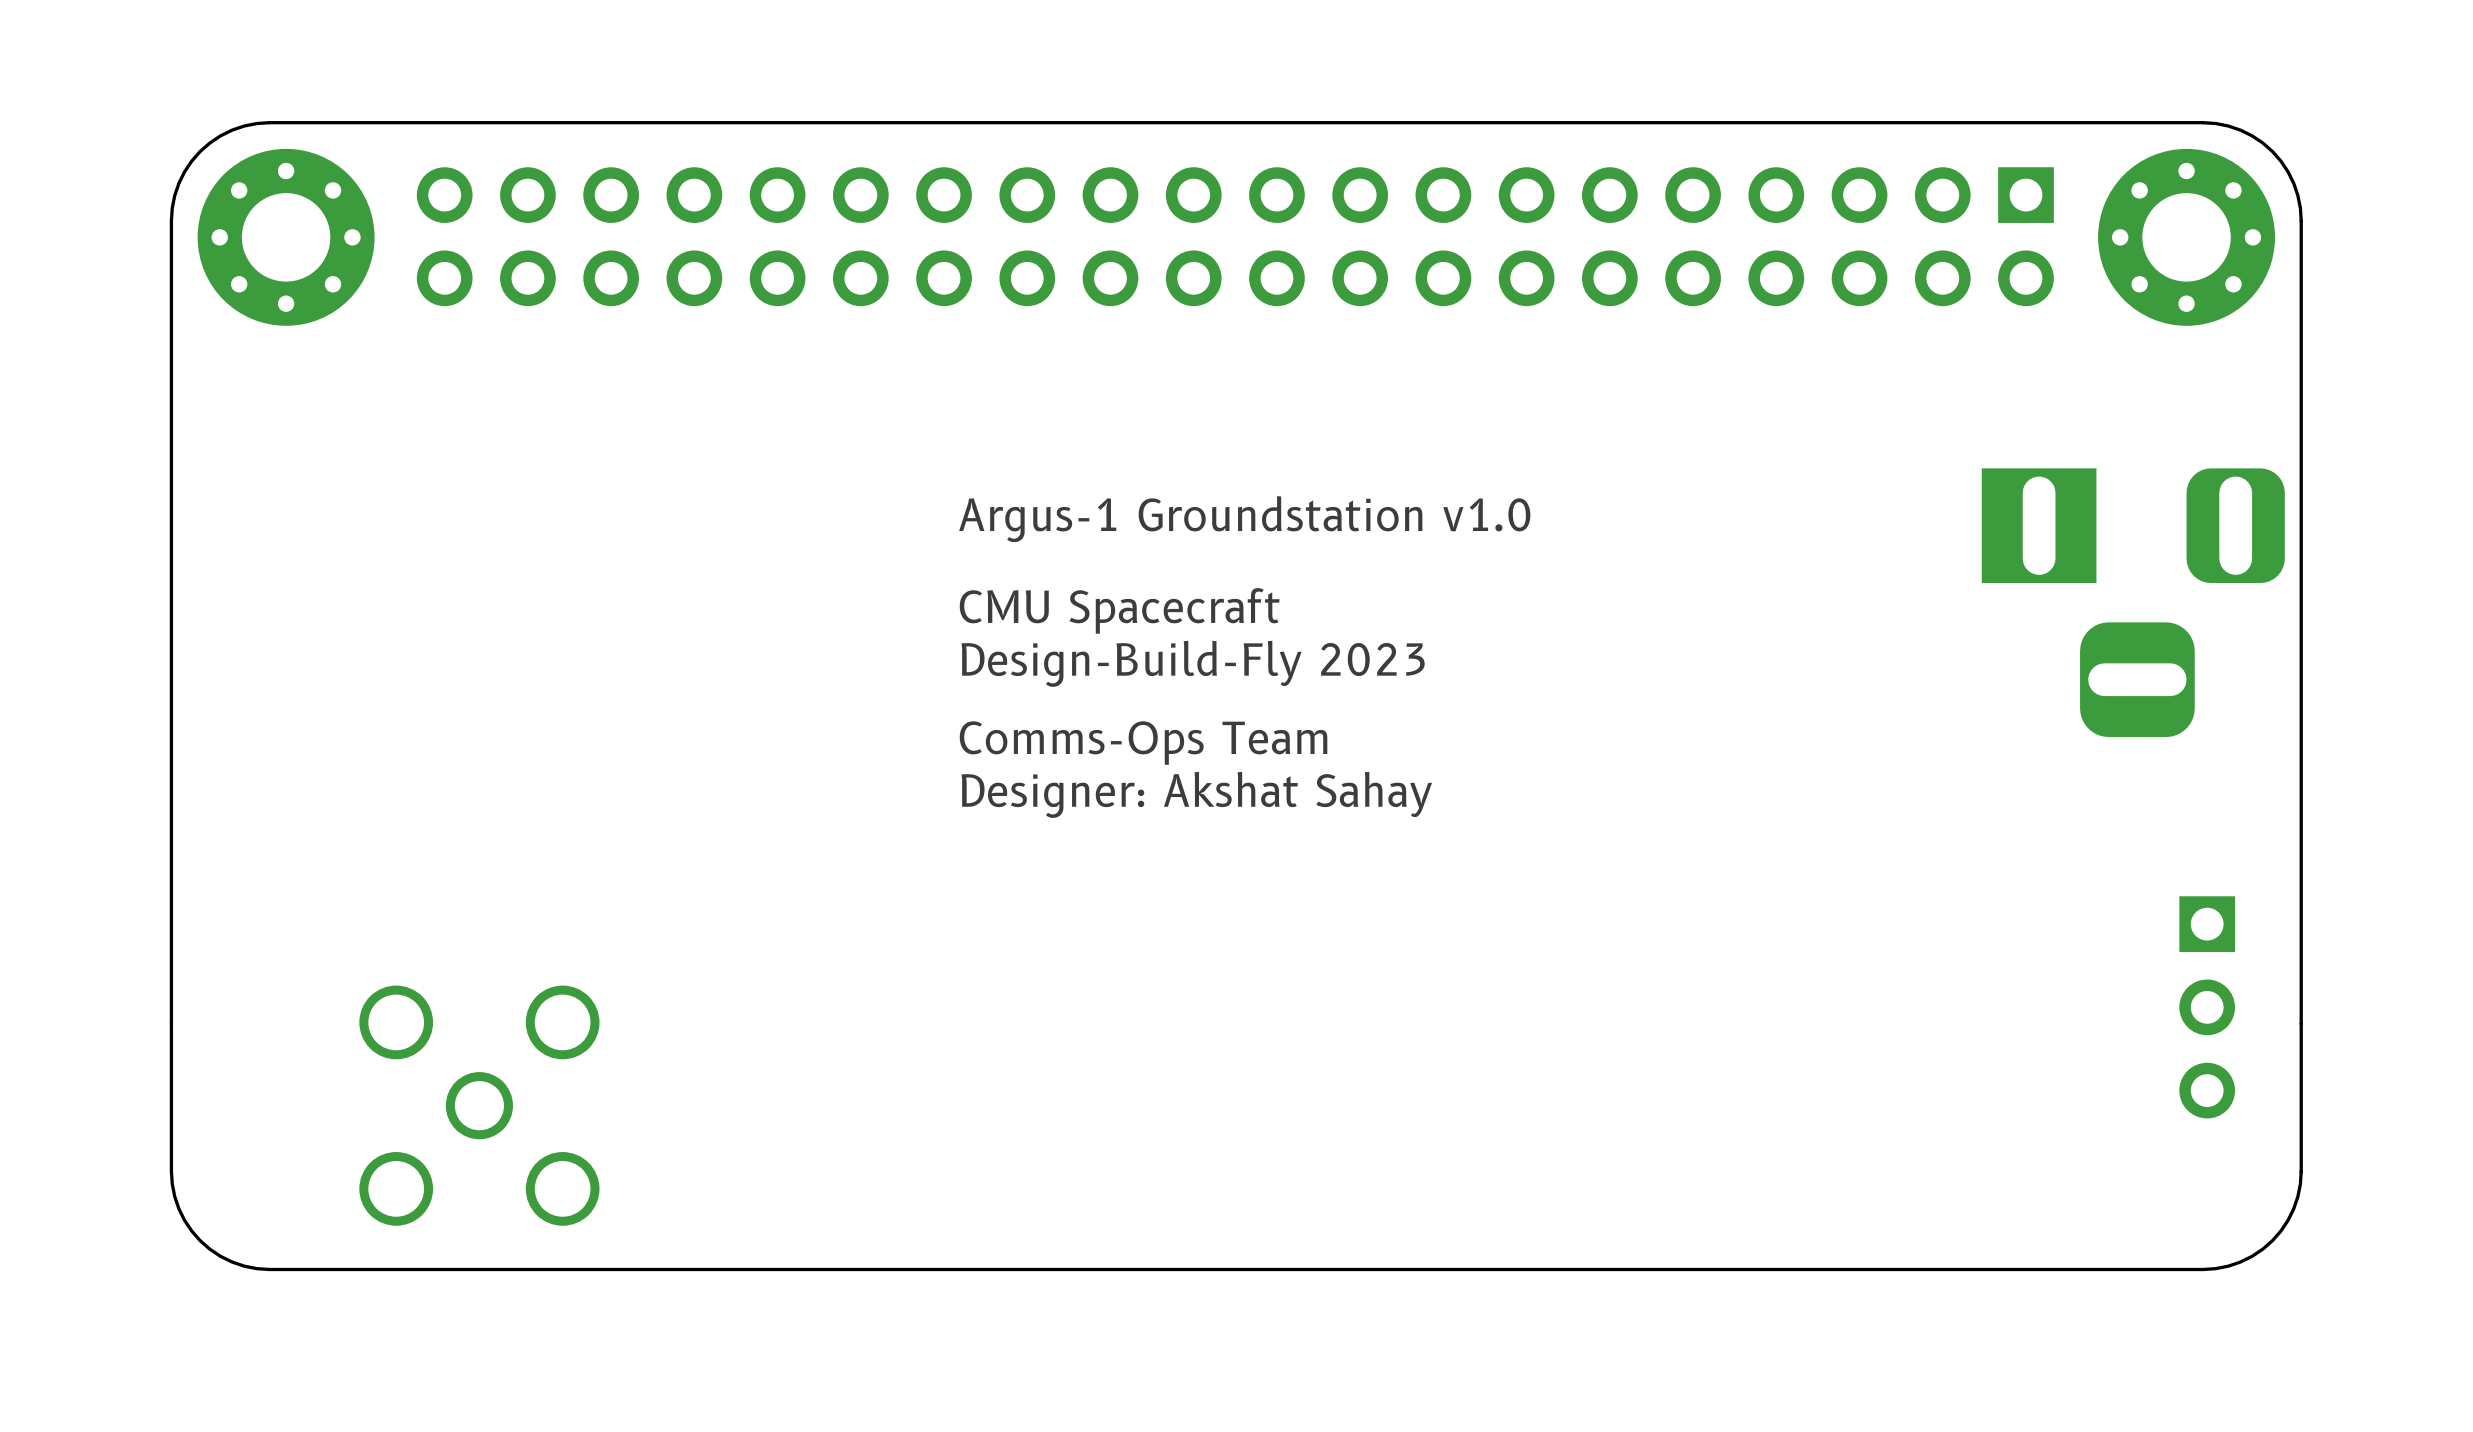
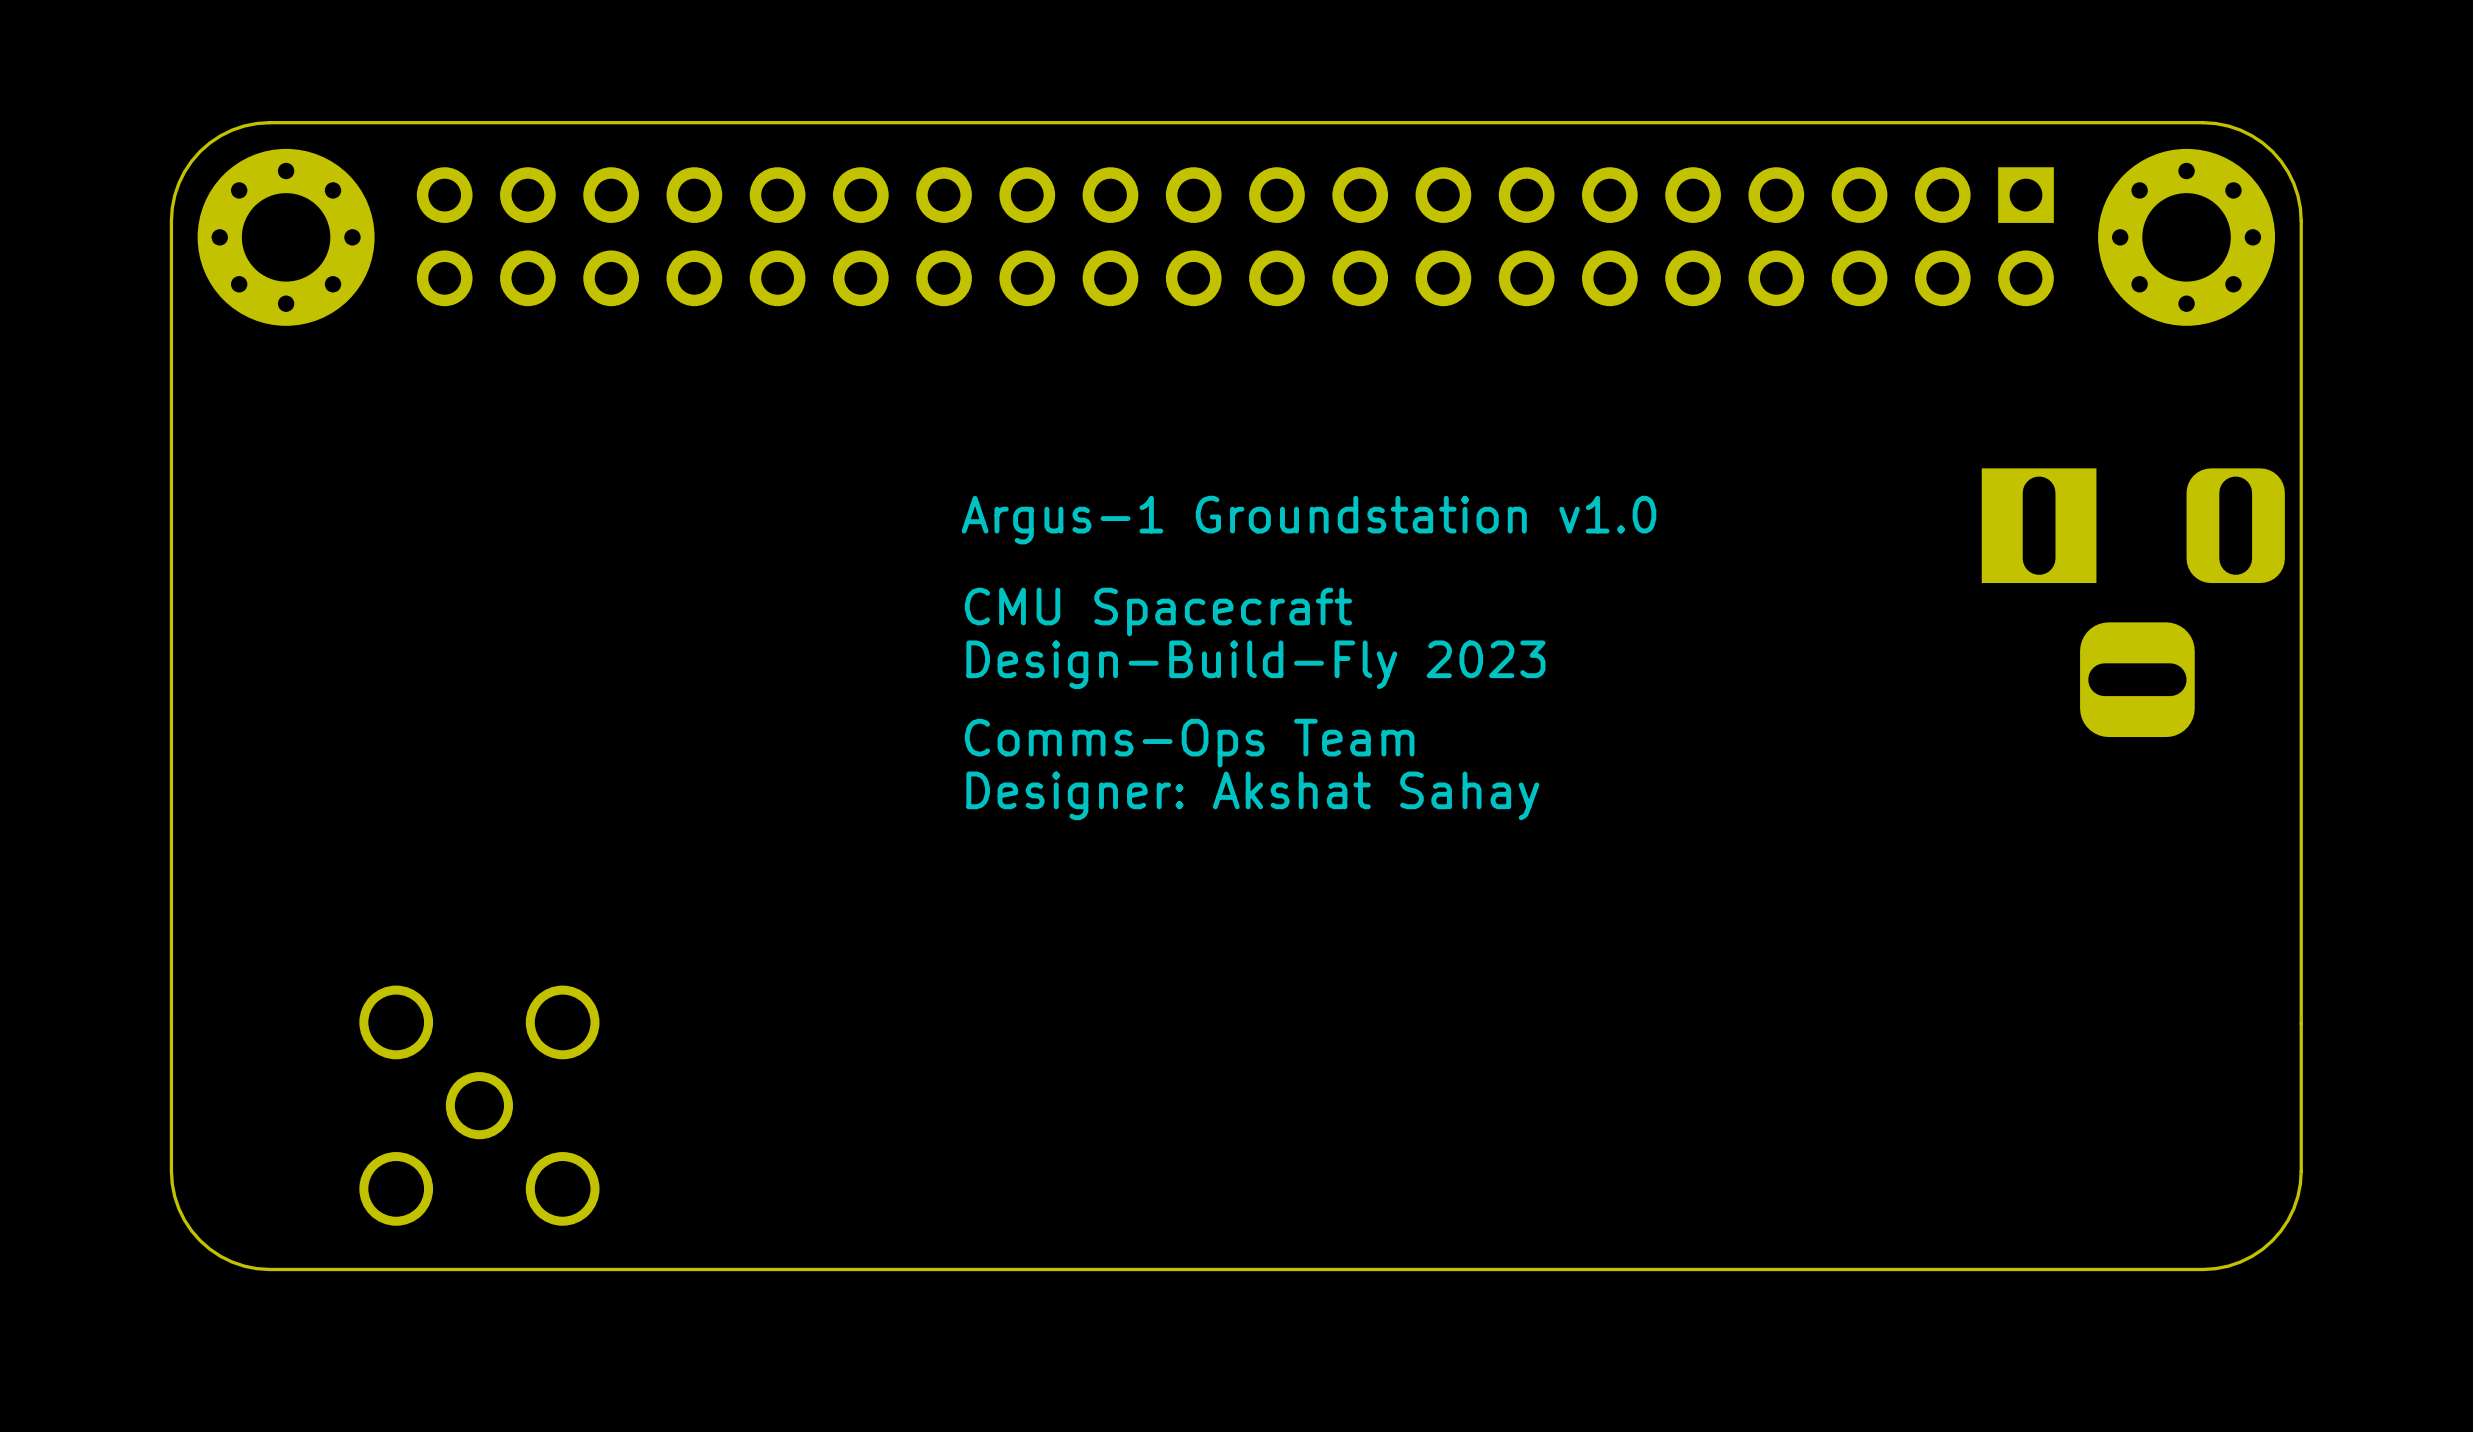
part: (2207, 1007) -> none

